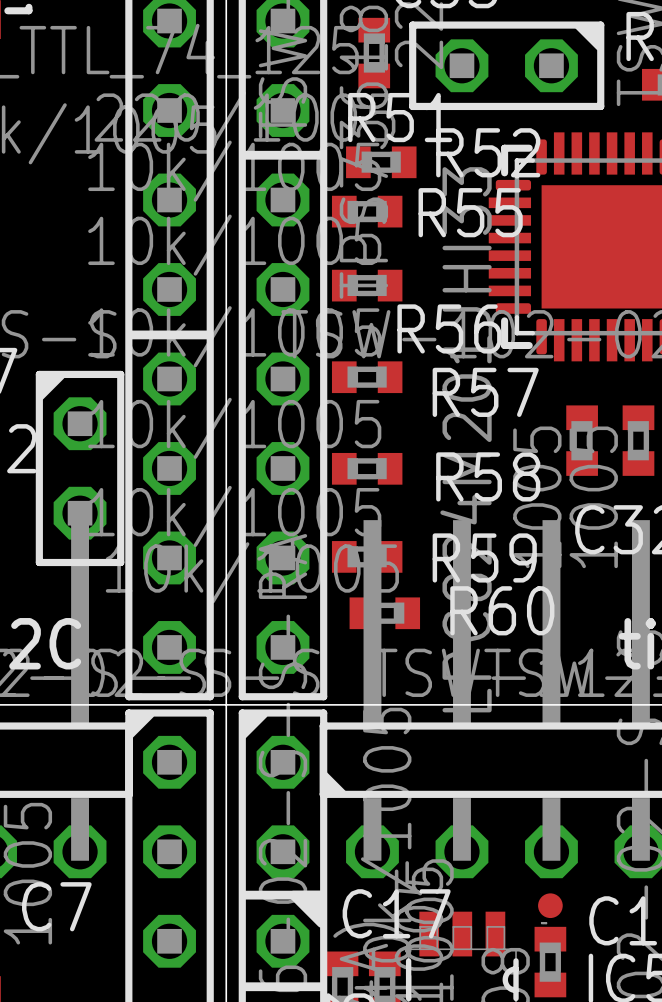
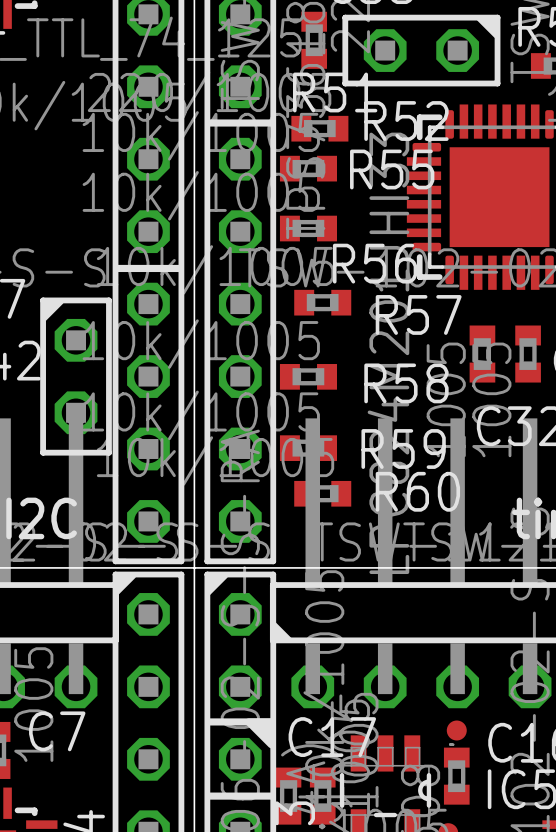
R57 position: (367, 377) -> (322, 302)

